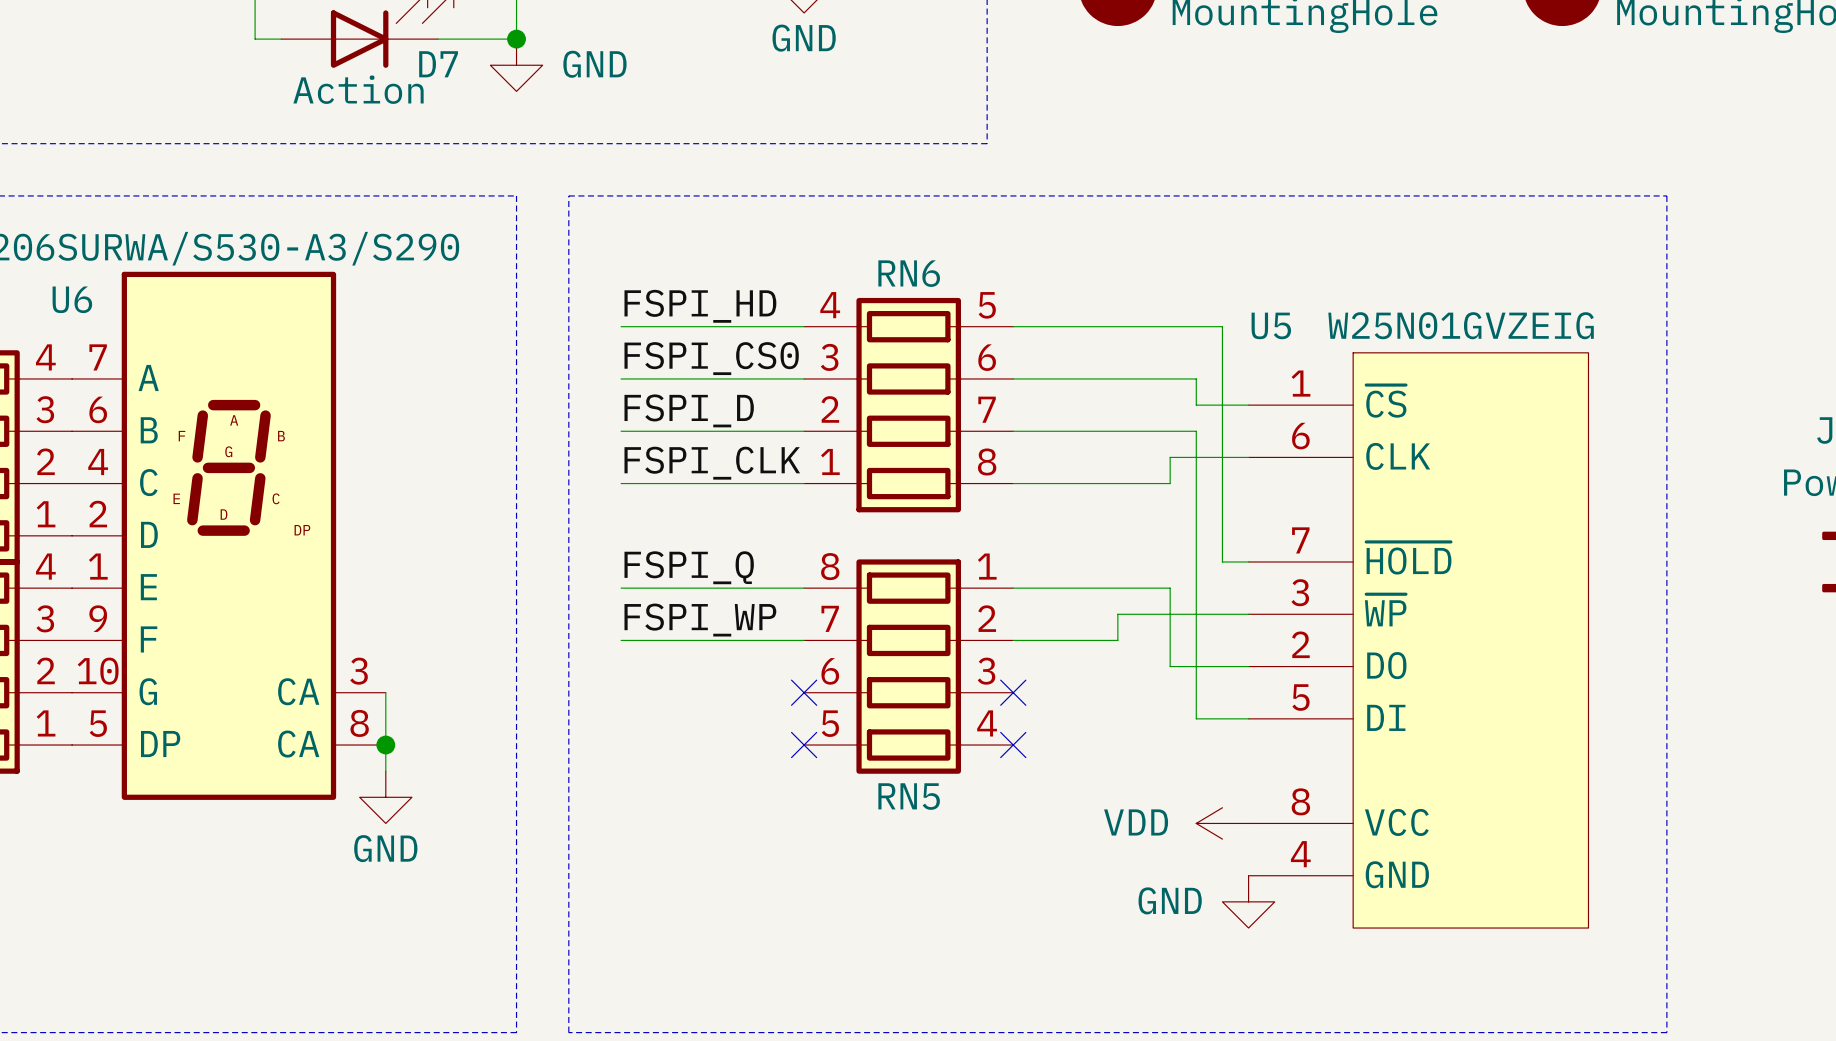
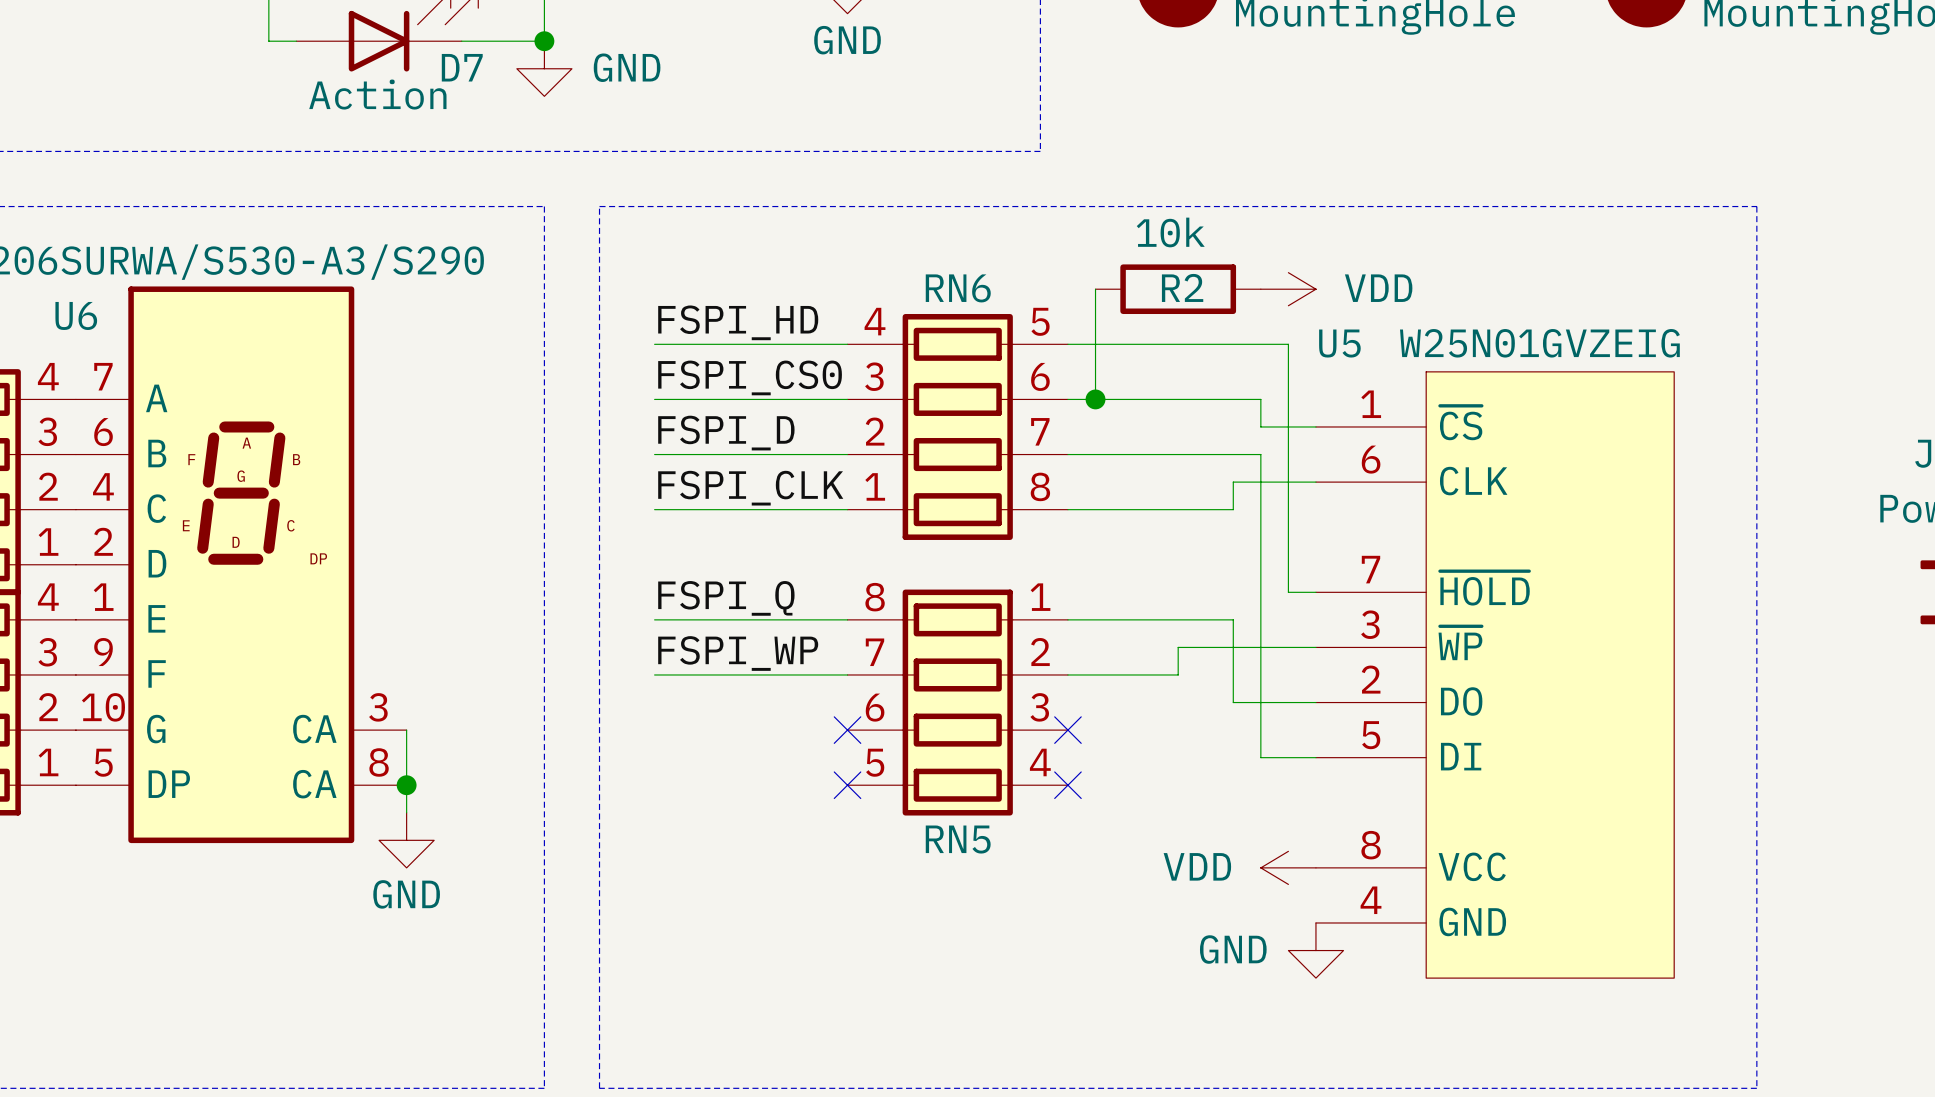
wire: none -> (1095, 289) (1095, 399)
R2: none -> 10k (1178, 289)
power symbol: none -> VDD (1288, 289)
junction: none -> (1095, 399)

